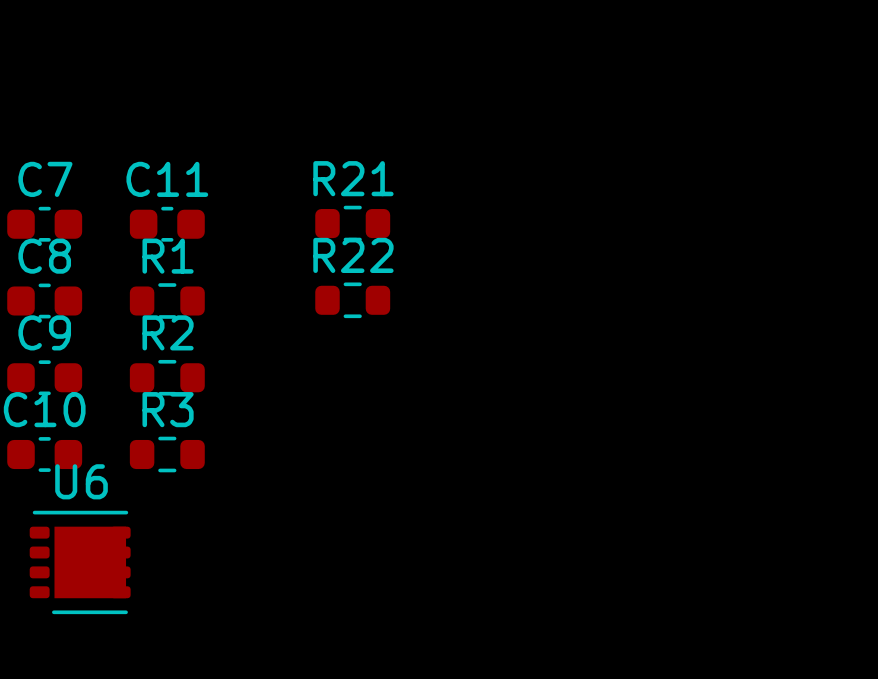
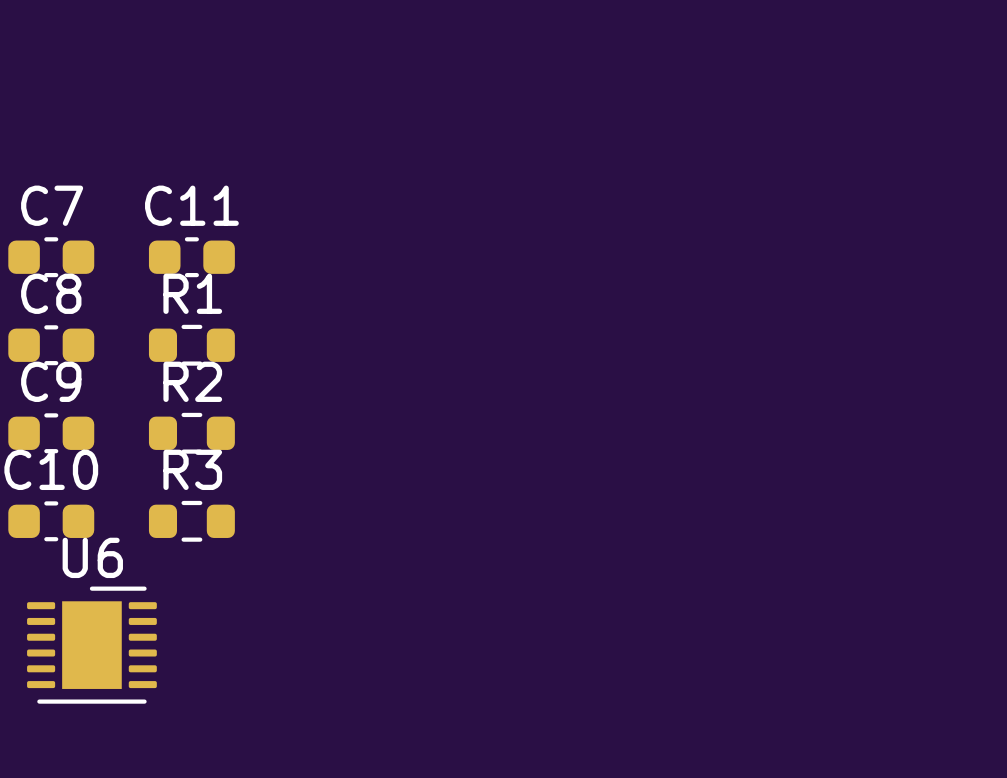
R21: (352, 223) -> none
R22: (352, 300) -> none
U6 footprint: [29, 510, 131, 615] -> [27, 586, 157, 704]

